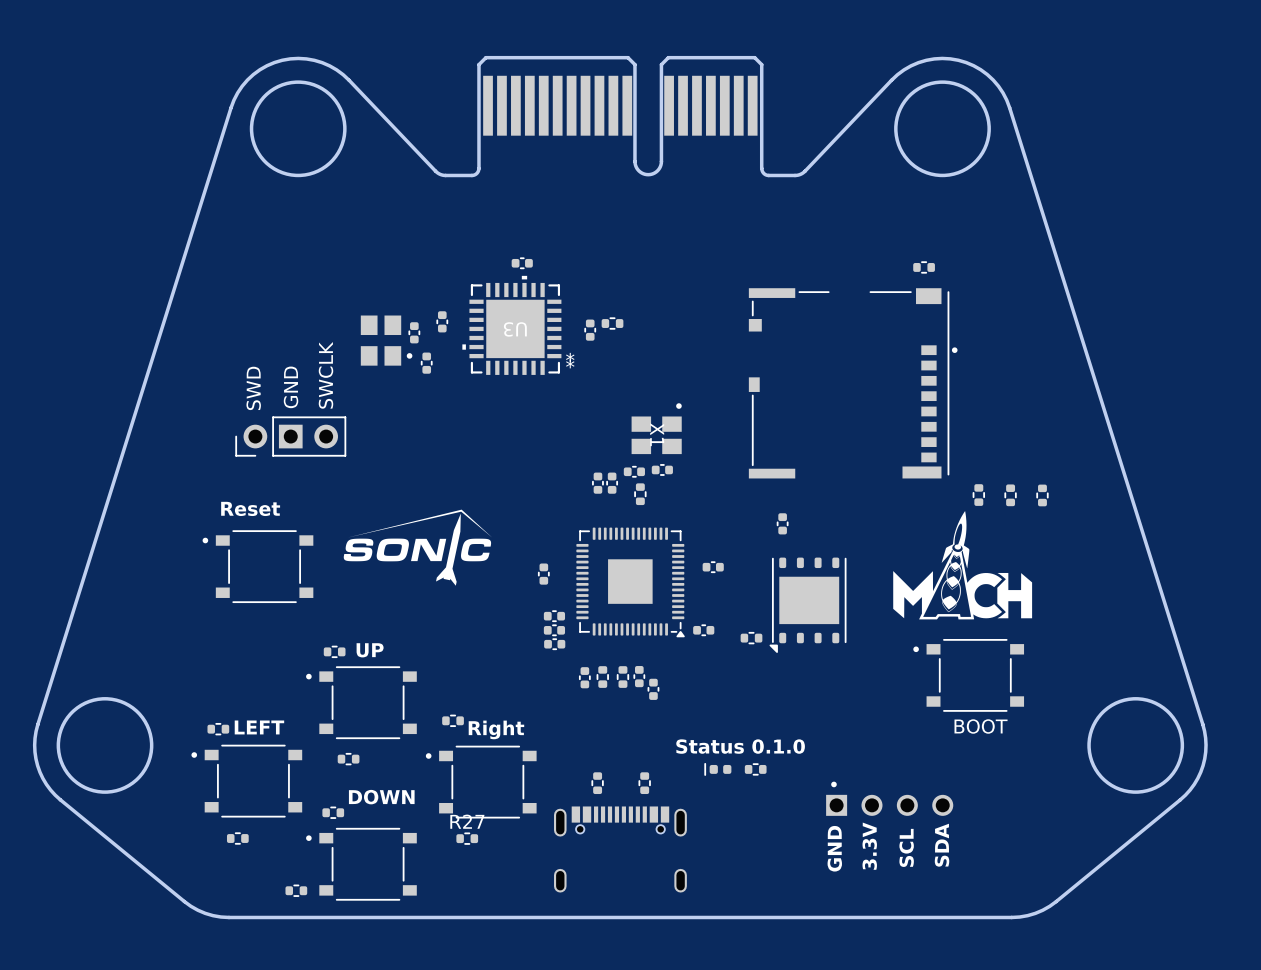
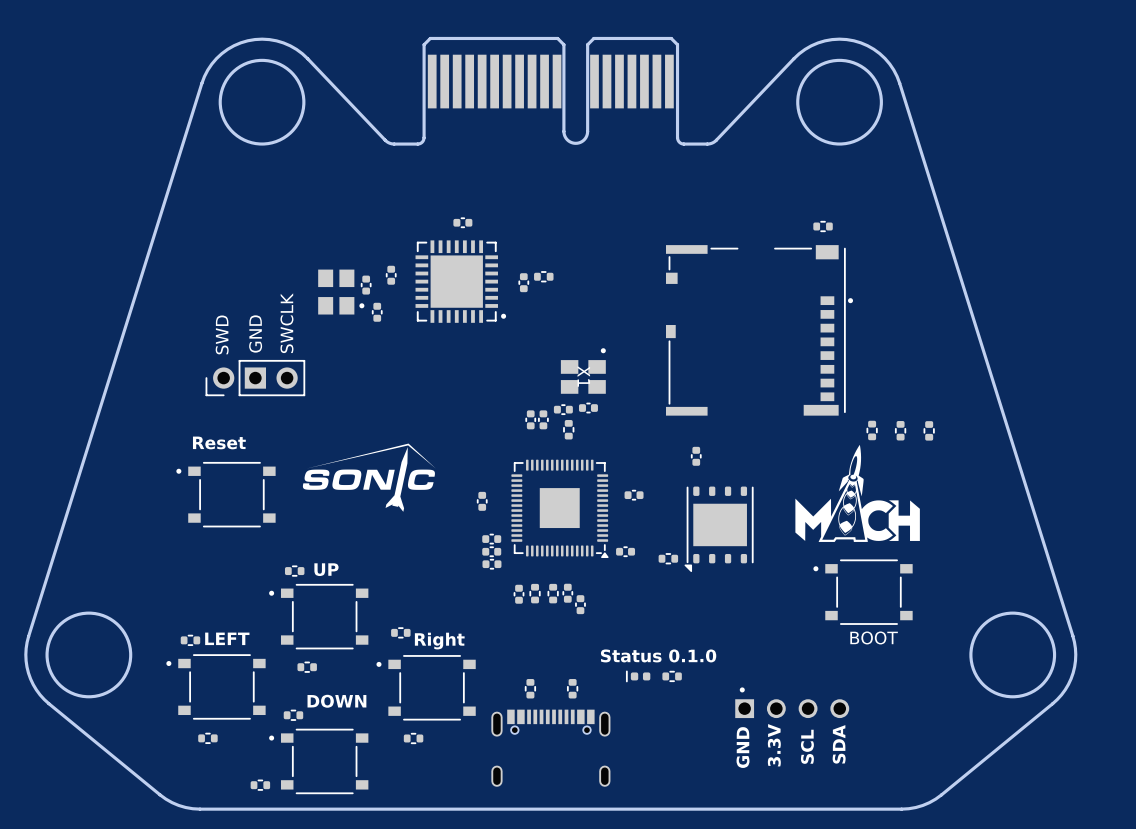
part: (511, 325) -> none
part: none -> (460, 281)
R27 name: R27 (467, 821) -> none

